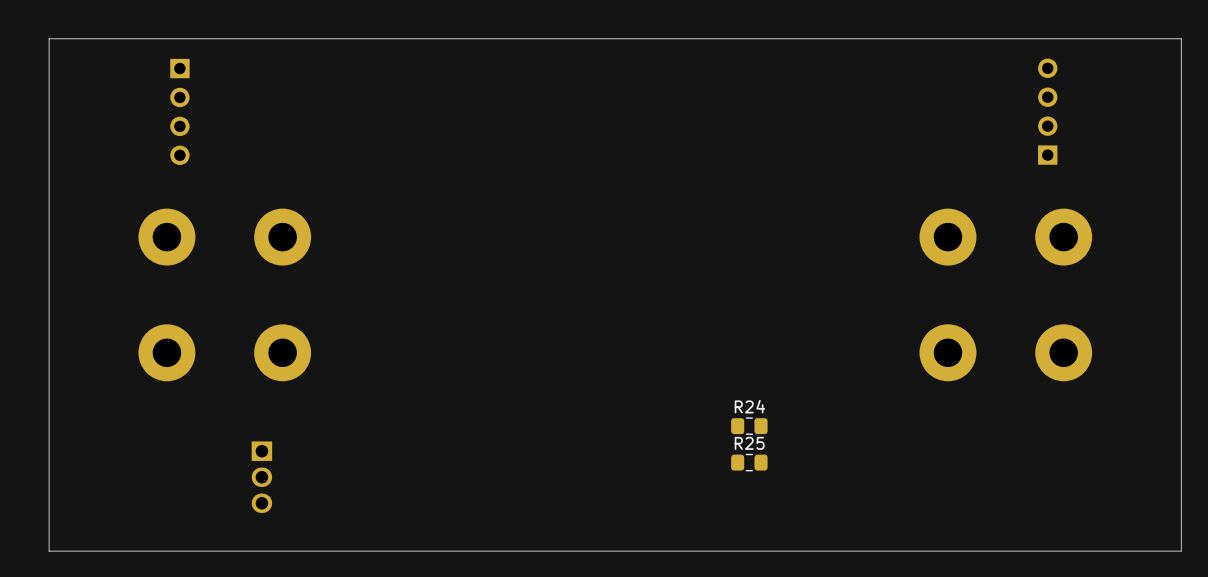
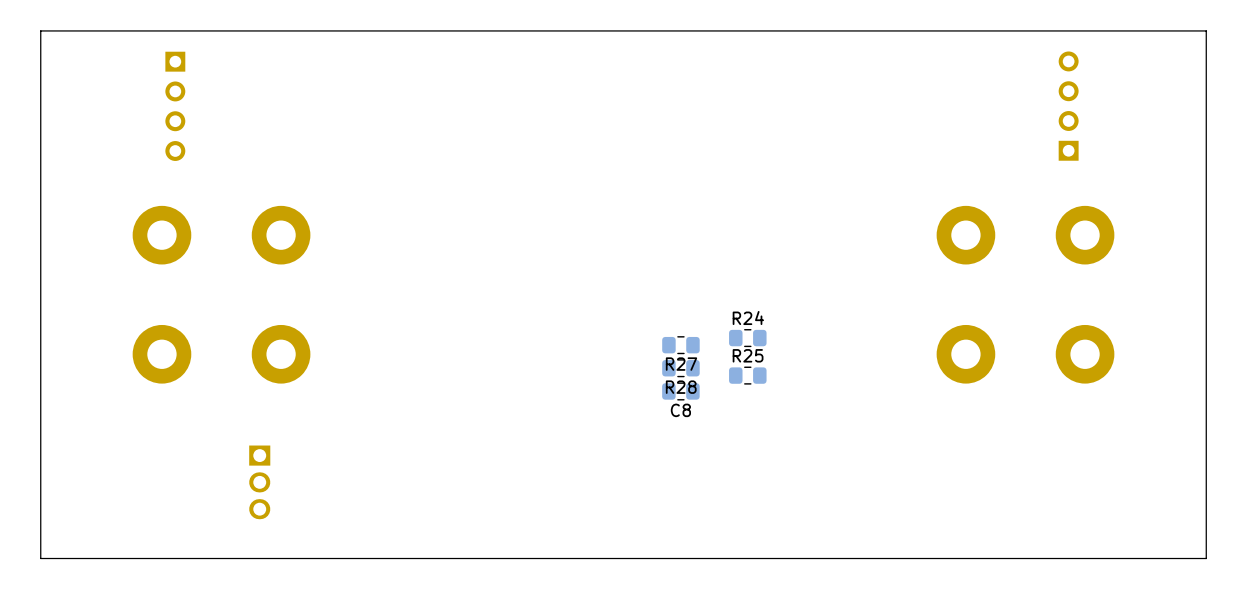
R27: none -> (680, 345)
R28: none -> (680, 368)
C8: none -> (680, 391)
R24 position: (749, 426) -> (747, 338)
R25 position: (749, 462) -> (747, 375)

